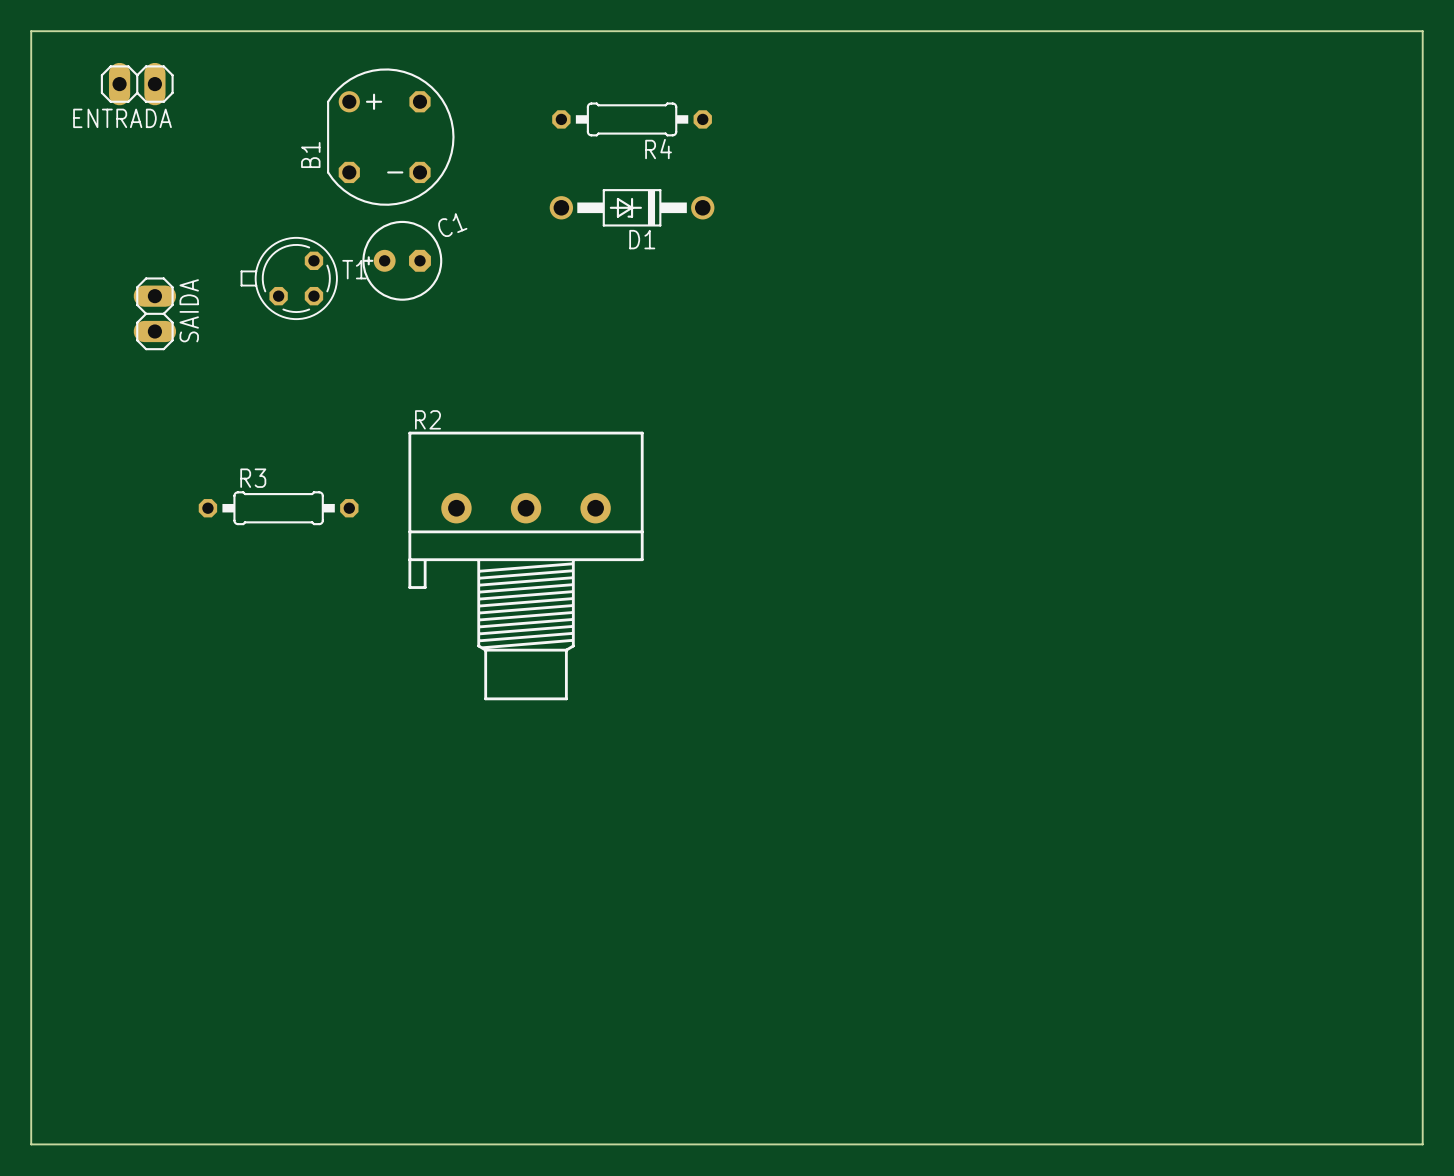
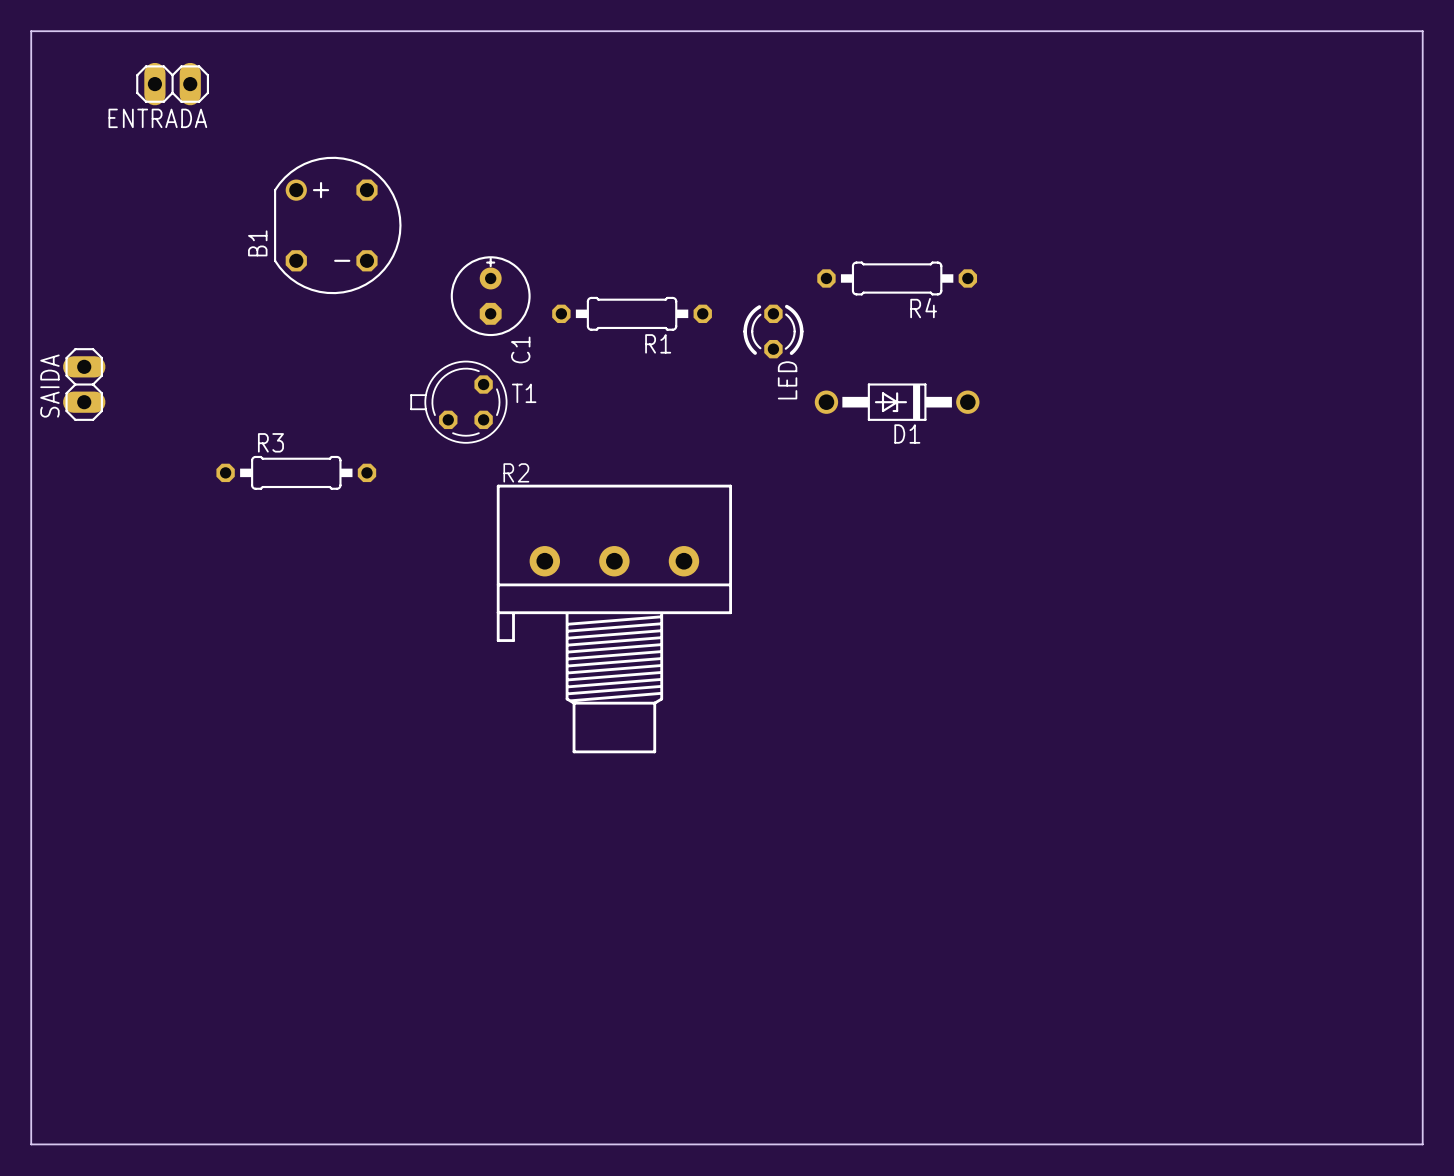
ENTRADA position: (137, 84) -> (172, 84)
R4 position: (632, 119) -> (897, 278)
B1 position: (390, 137) -> (337, 225)
D1 position: (632, 207) -> (897, 402)
C1 rotation: 0° (402, 260) -> 90° clockwise (490, 296)
C1 position: (402, 260) -> (490, 296)
T1 position: (289, 278) -> (458, 402)
SAIDA name position: SAIDA (189, 310) -> SAIDA (49, 386)
SAIDA position: (154, 313) -> (84, 384)
R1: none -> (632, 313)
LED: none -> (773, 331)
R3 position: (278, 508) -> (296, 472)
R2 position: (526, 565) -> (614, 618)

